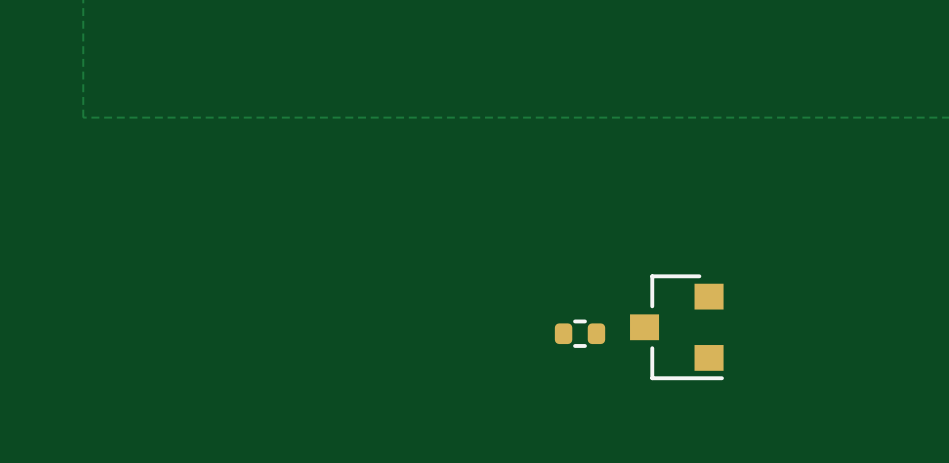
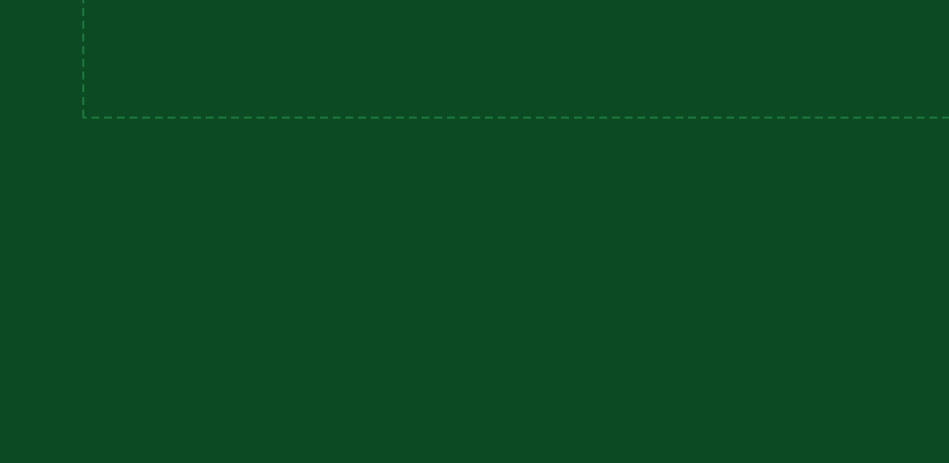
part: (676, 327) -> none
part: (580, 333) -> none

